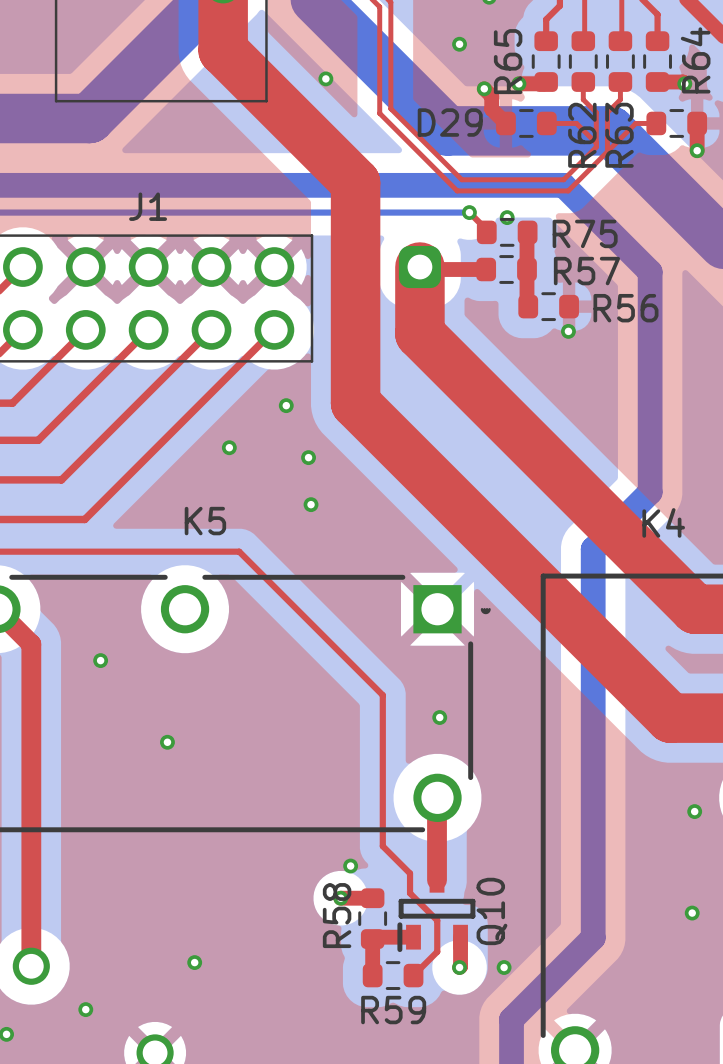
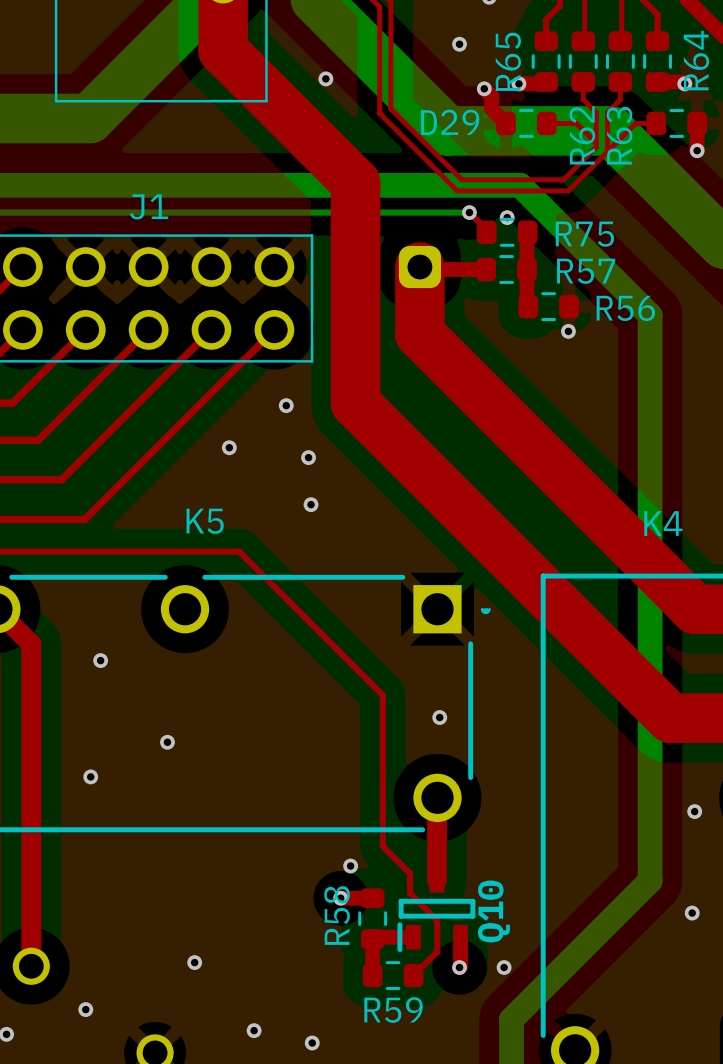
bottom track: (520, 185) (563, 185) (650, 271) (650, 315) -> (520, 185) (650, 315)
bottom track: (650, 492) (593, 549) (593, 937) -> (650, 492) (650, 880) (593, 937)
via: none -> (90, 776)
via: none -> (254, 1030)
via: none -> (312, 1043)

